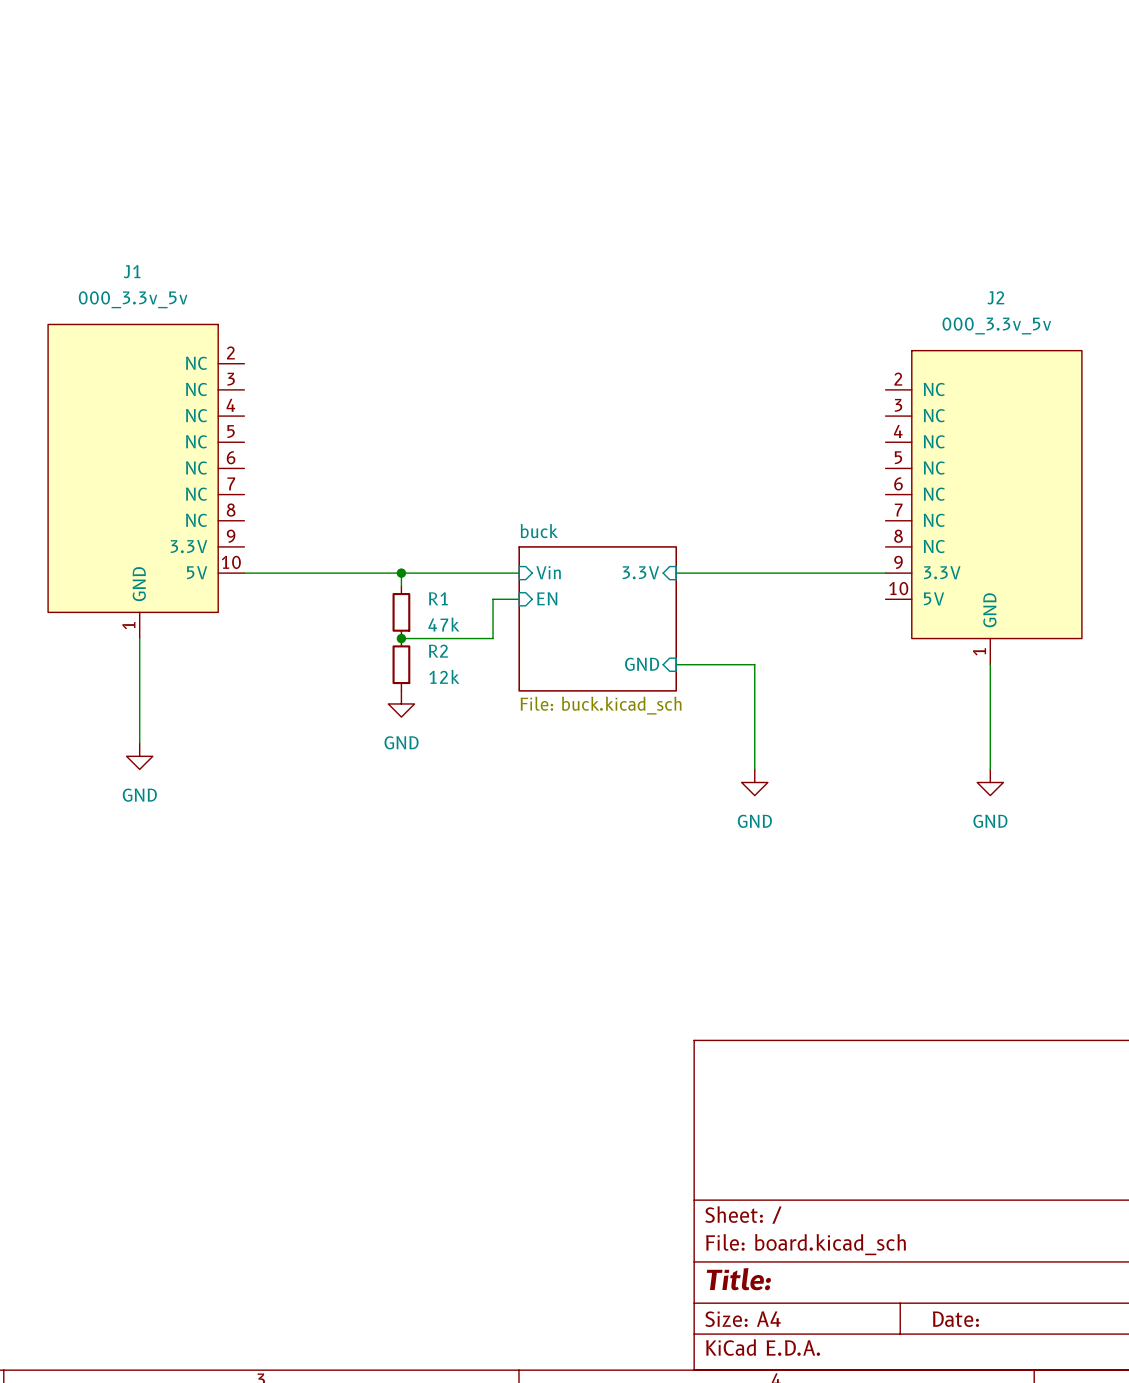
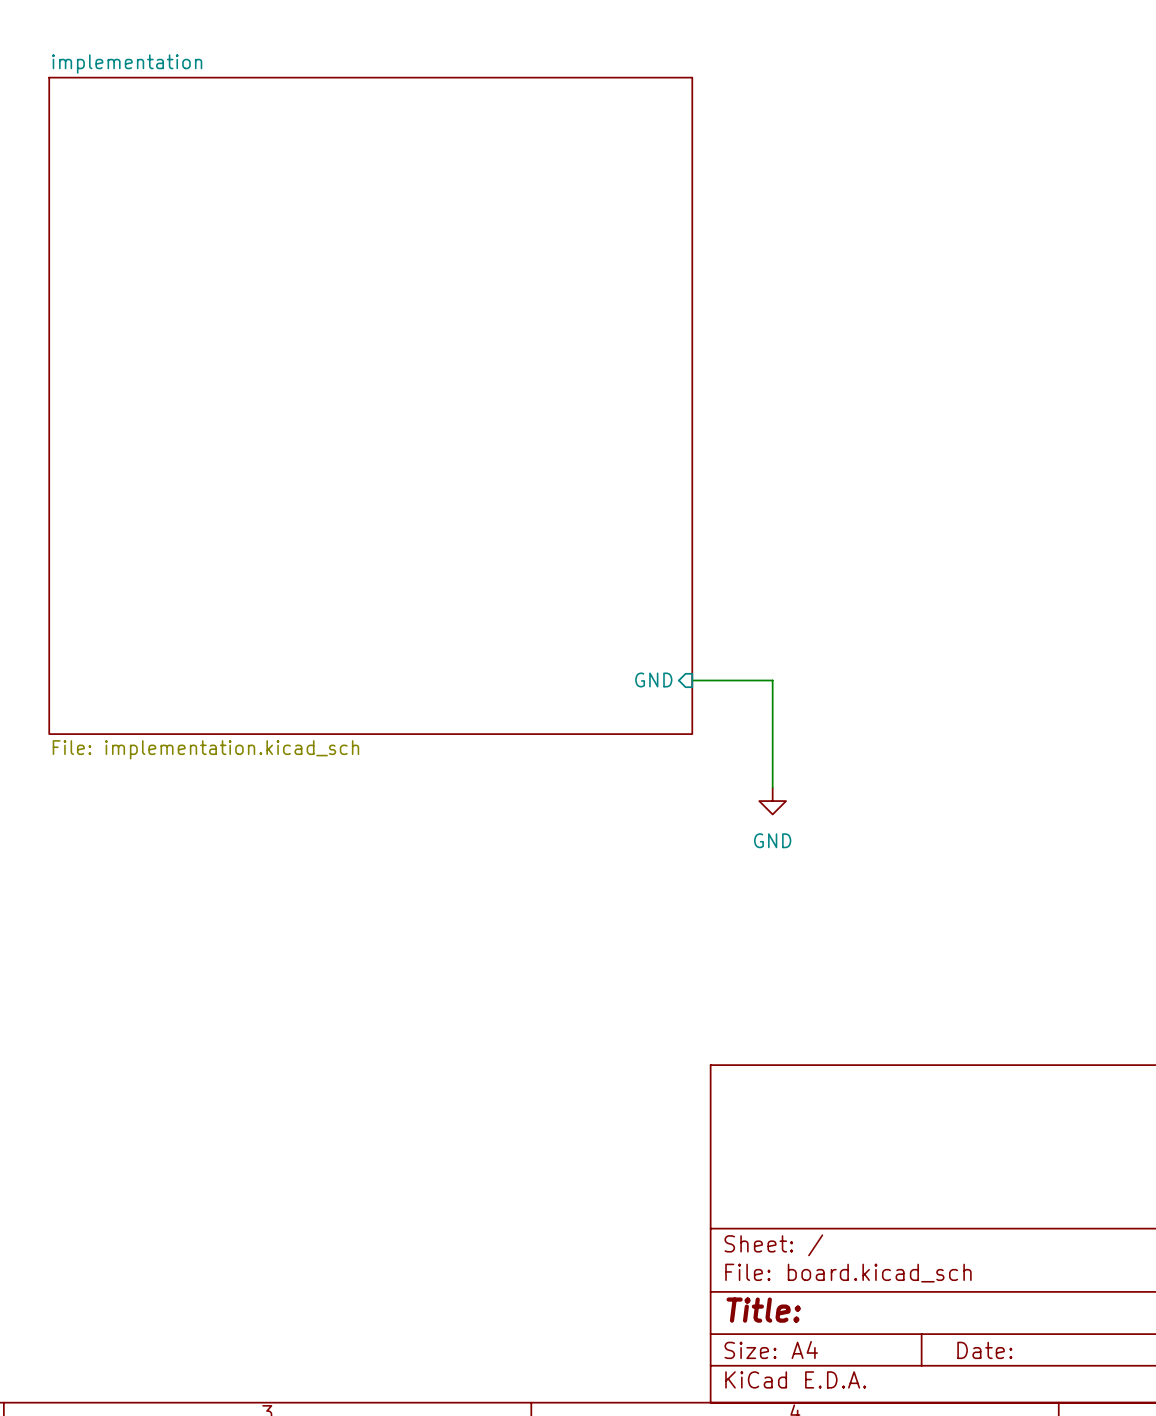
sheet implementation: none -> File: implementation.kicad_sch (370, 405)
J1: 000_3.3v_5v (146, 481) -> none
J2: 000_3.3v_5v (983, 507) -> none
sheet pin: Vin (548, 572) -> none
sheet pin: 3.3V (640, 572) -> none
wire: (244, 573) (519, 573) -> none
wire: (401, 573) (401, 586) -> none
junction: (401, 573) -> none
wire: (676, 573) (885, 573) -> none
sheet pin: EN (547, 598) -> none
wire: (519, 599) (493, 599) (493, 638) (401, 638) -> none
R1: 47k (401, 612) -> none
sheet buck: File: buck.kicad_sch (597, 618) -> none
wire: (139, 638) (139, 743) -> none
junction: (401, 638) -> none
R2: 12k (401, 664) -> none
wire: (990, 664) (990, 769) -> none
power symbol: GND (401, 703) -> none
power symbol: GND (139, 756) -> none
power symbol: GND (990, 782) -> none

